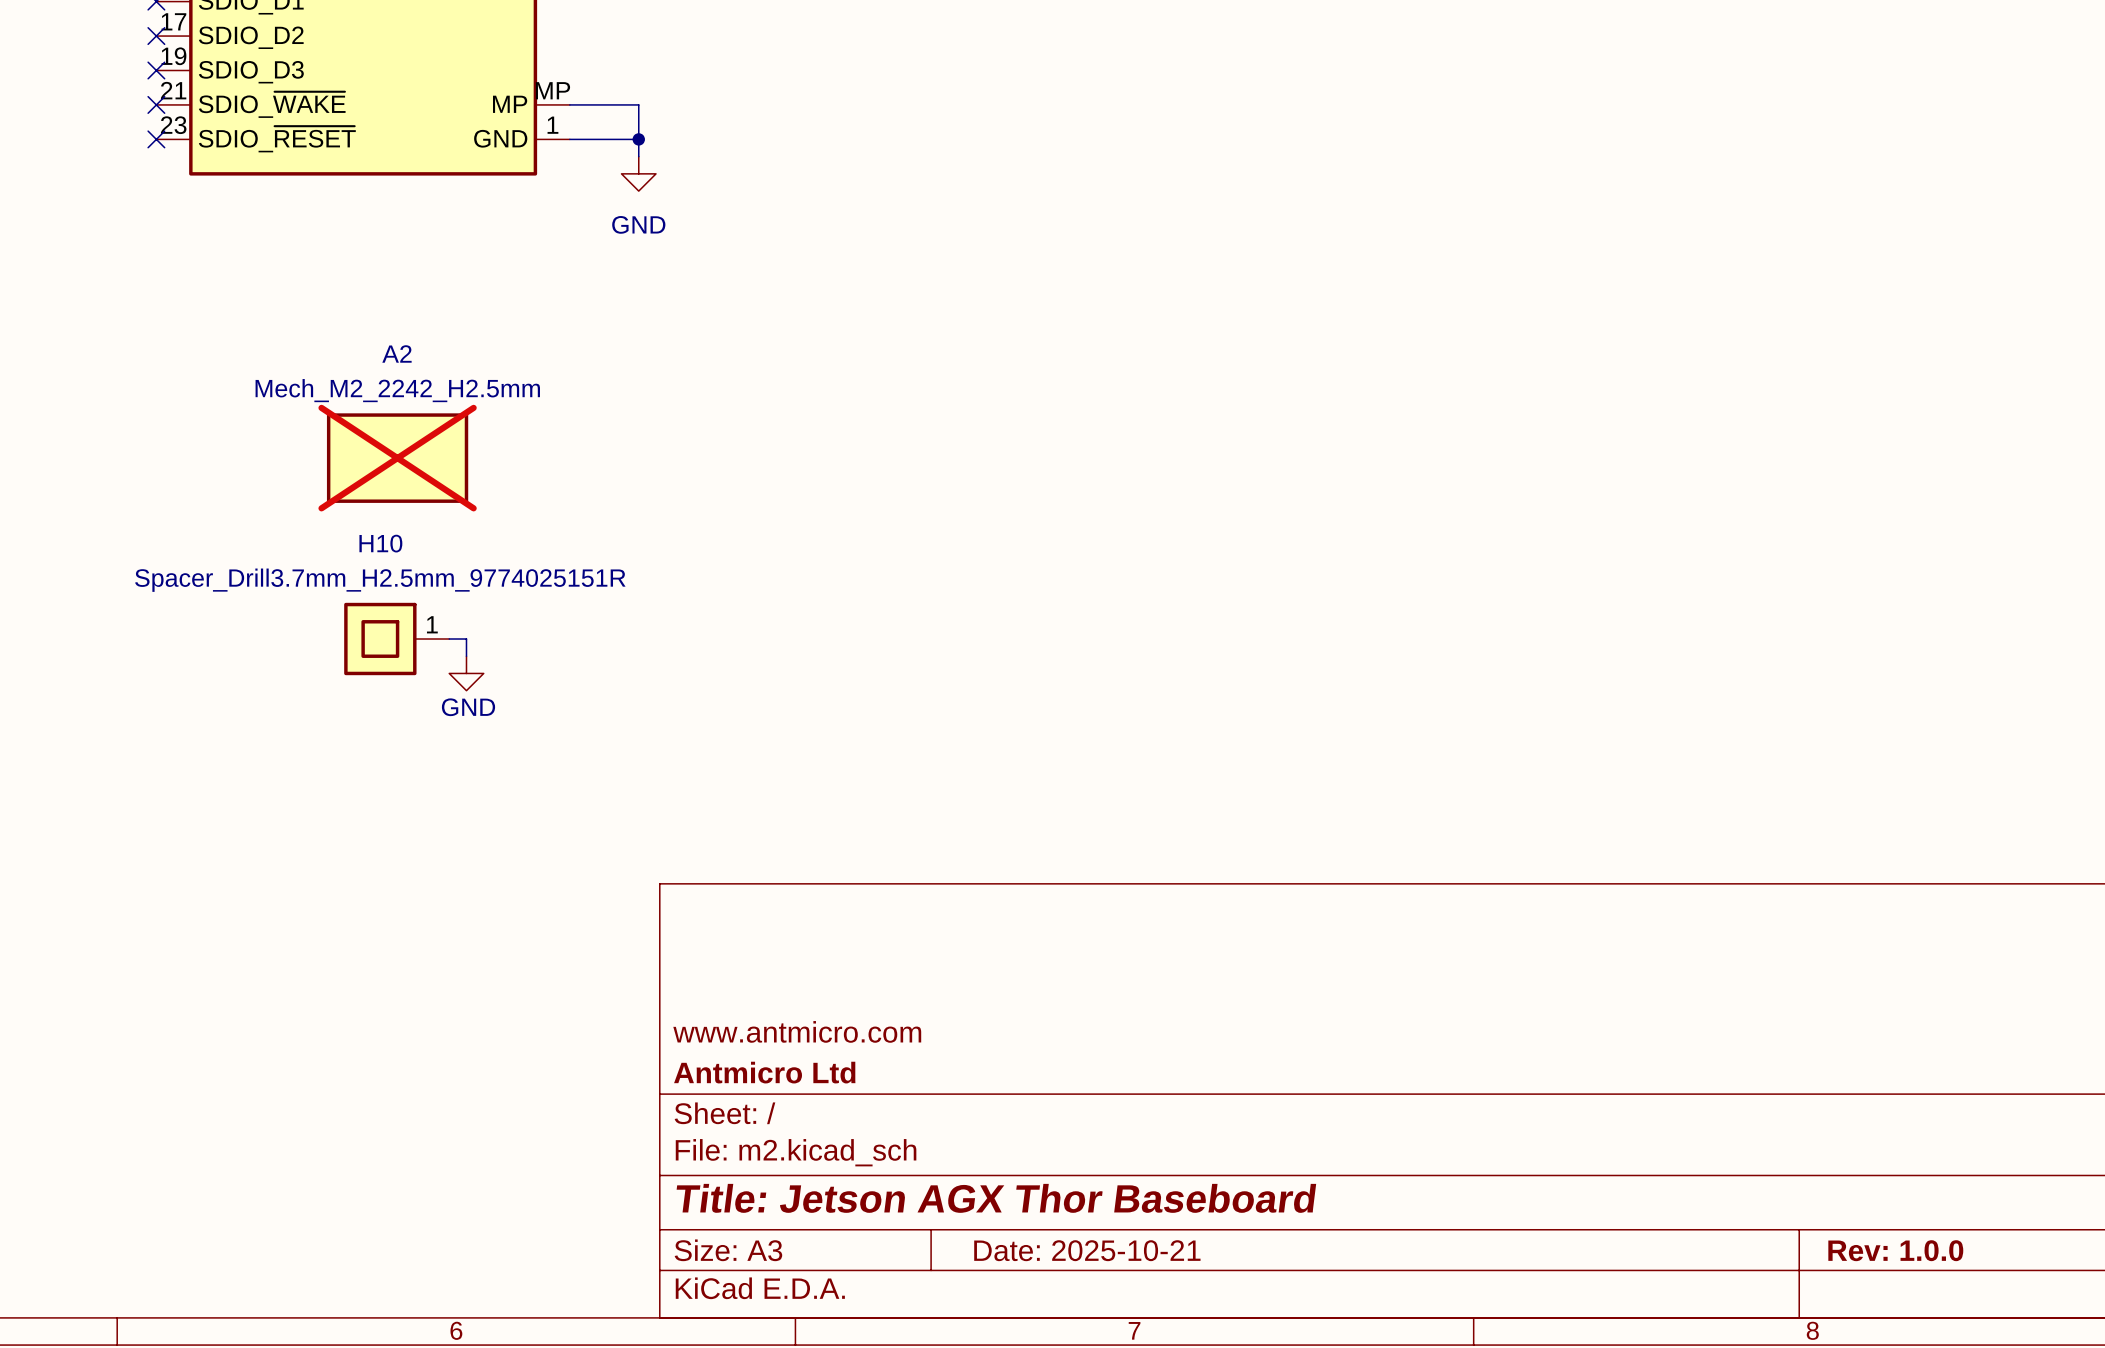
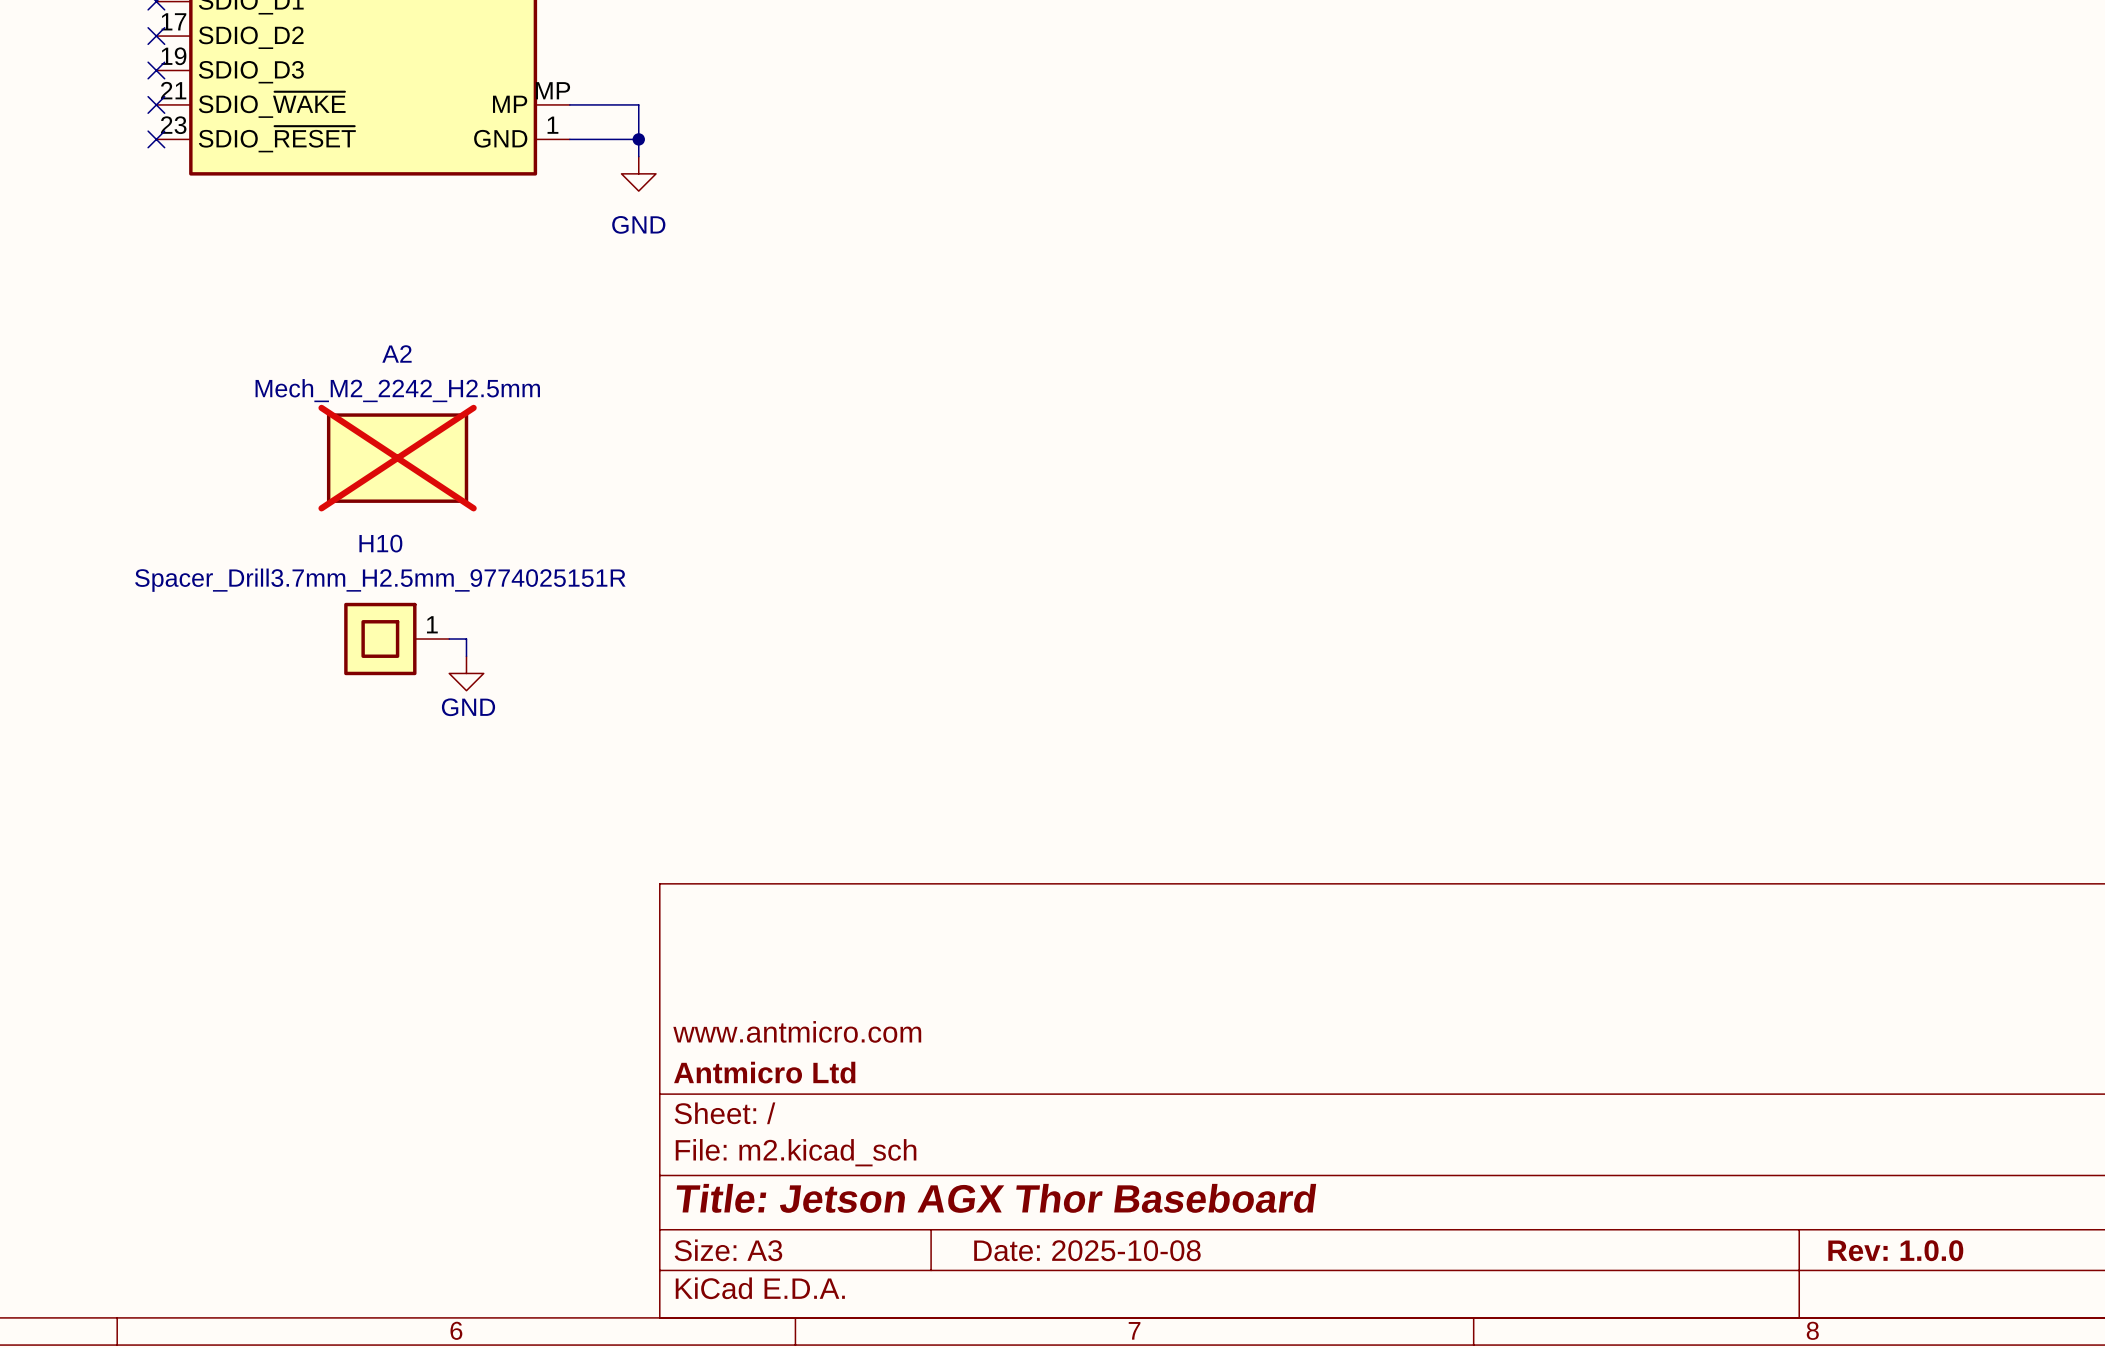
title block: Date: 2025-10-21 (1087, 1250) -> Date: 2025-10-08 (1087, 1250)

